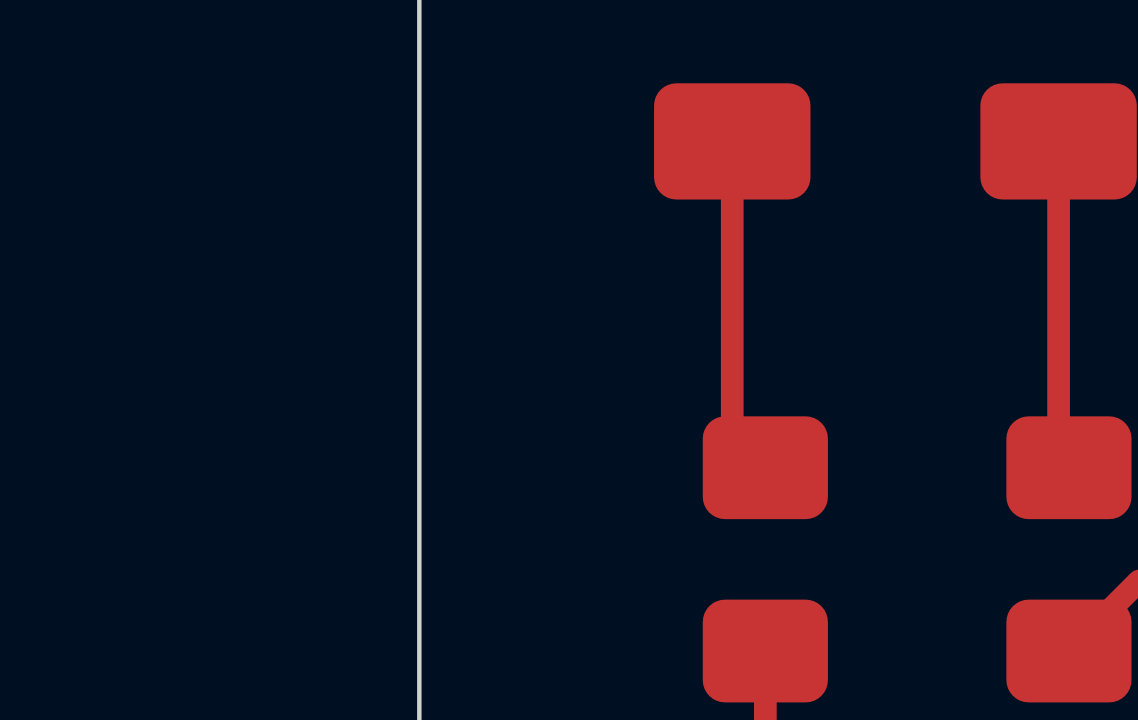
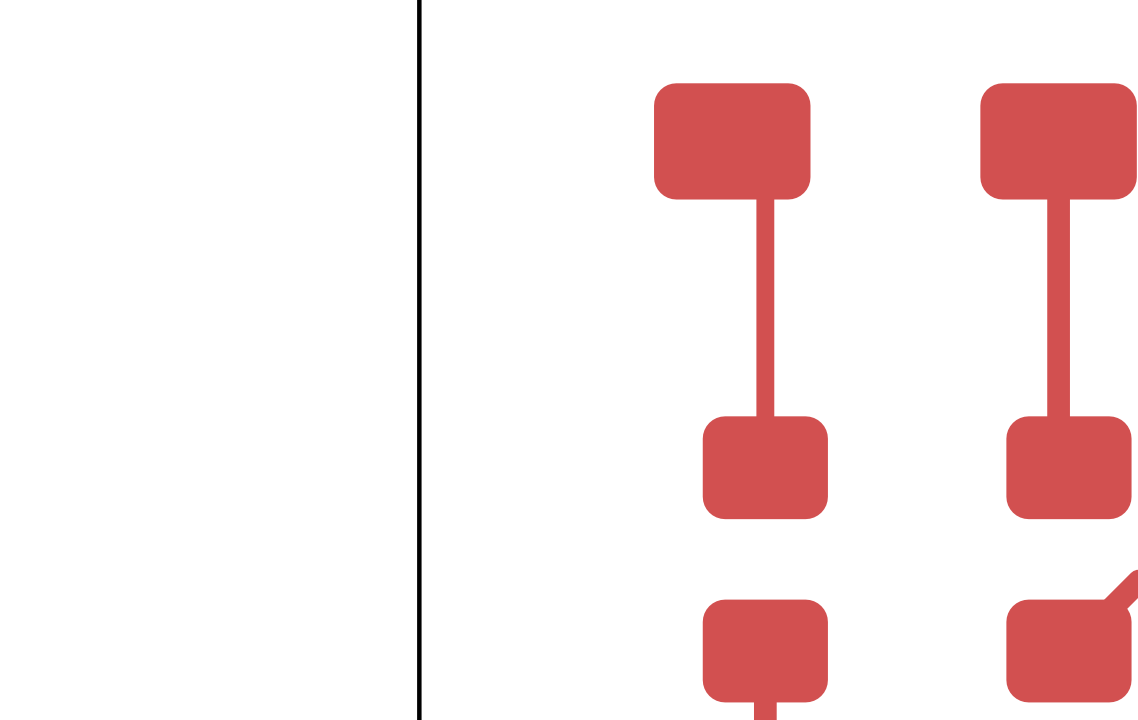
top track: (732, 141) (732, 434) (765, 467) -> (732, 141) (765, 174) (765, 467)

